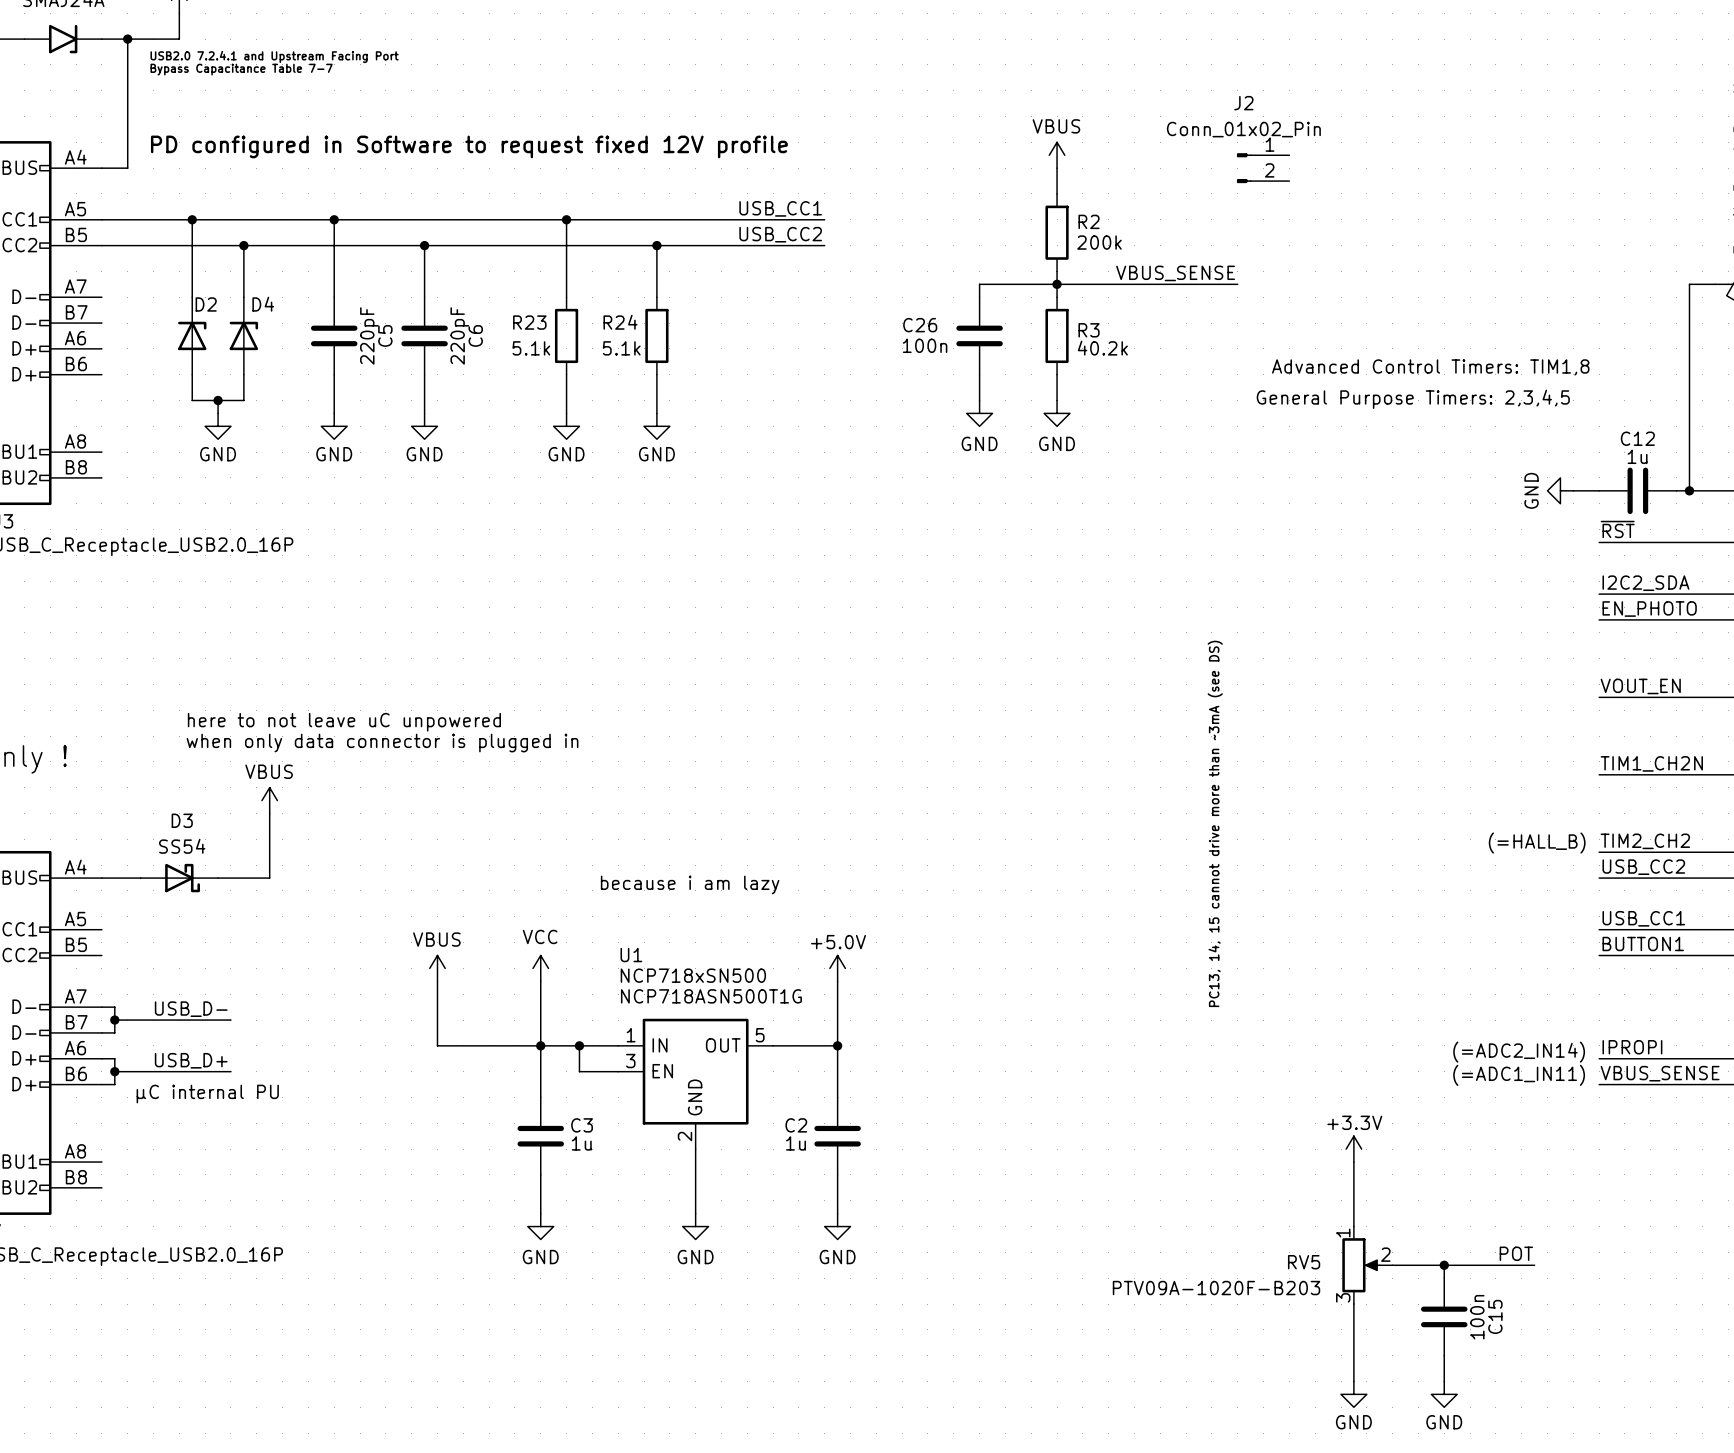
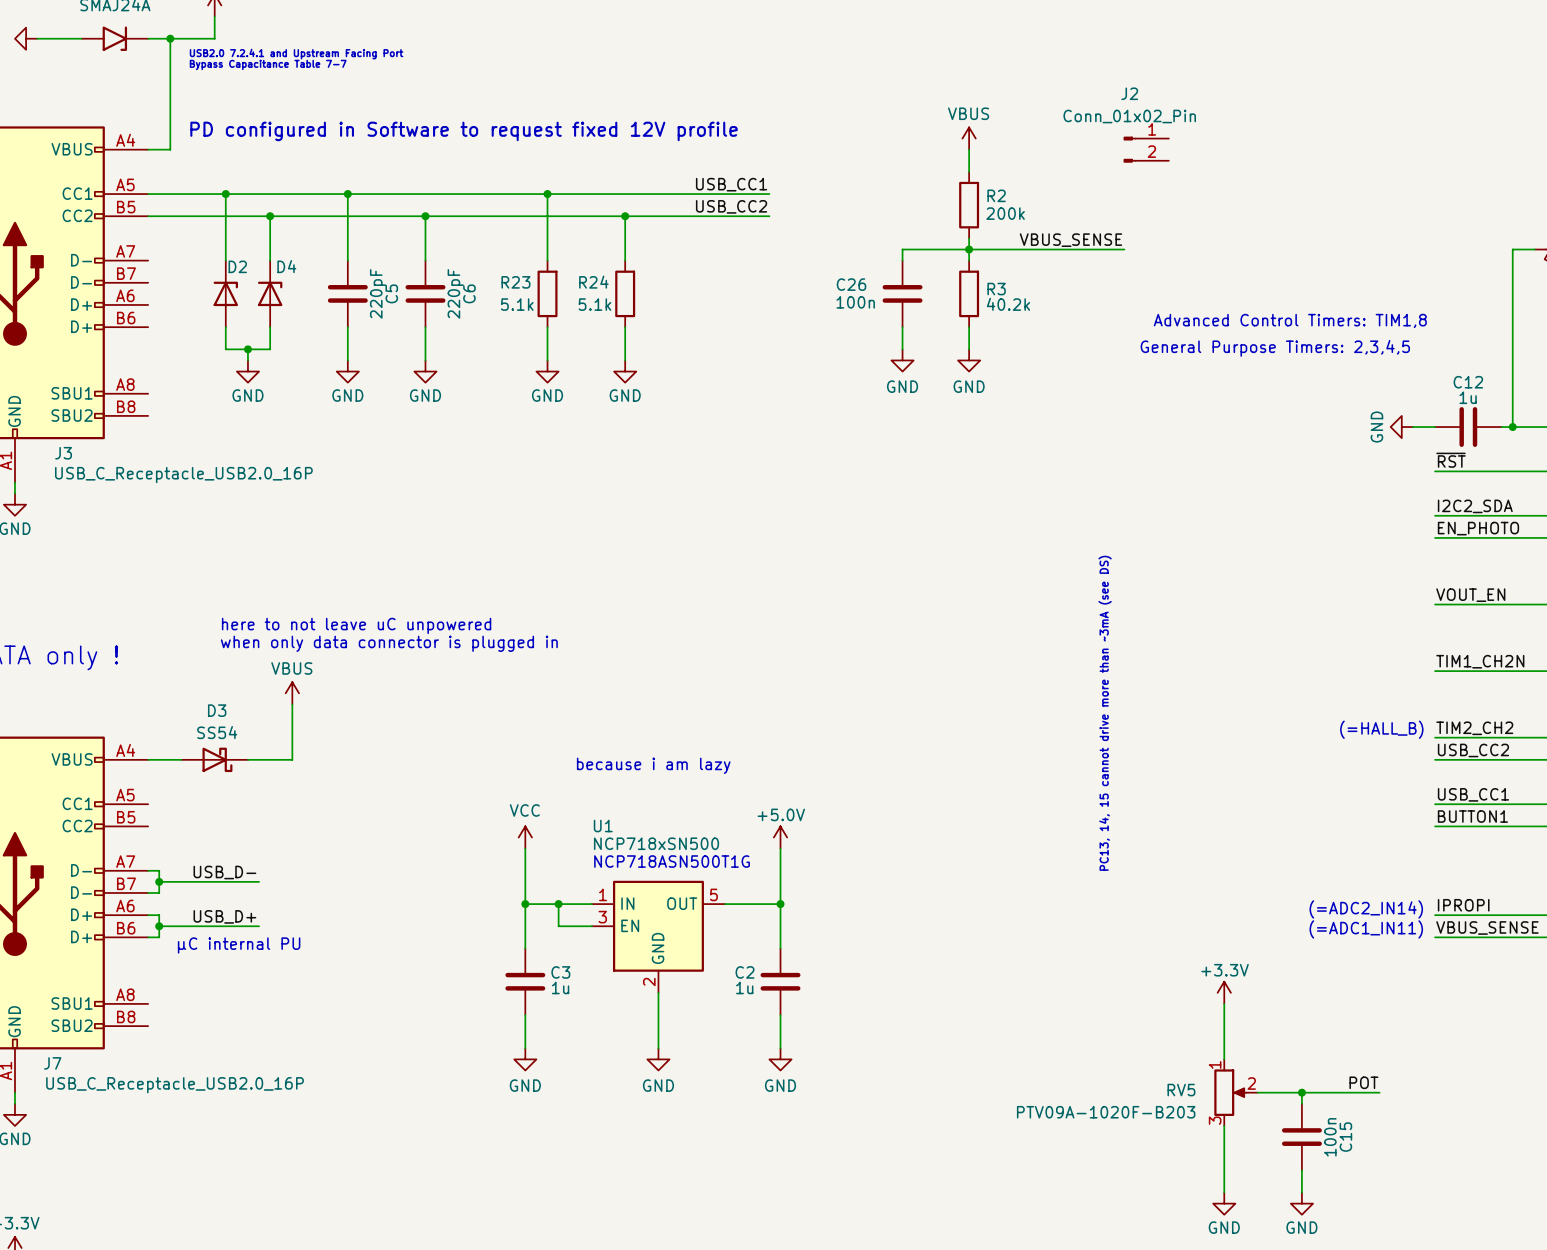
power symbol: VBUS (437, 968) -> none
wire: (437, 981) (437, 1045) (540, 1045) -> none

